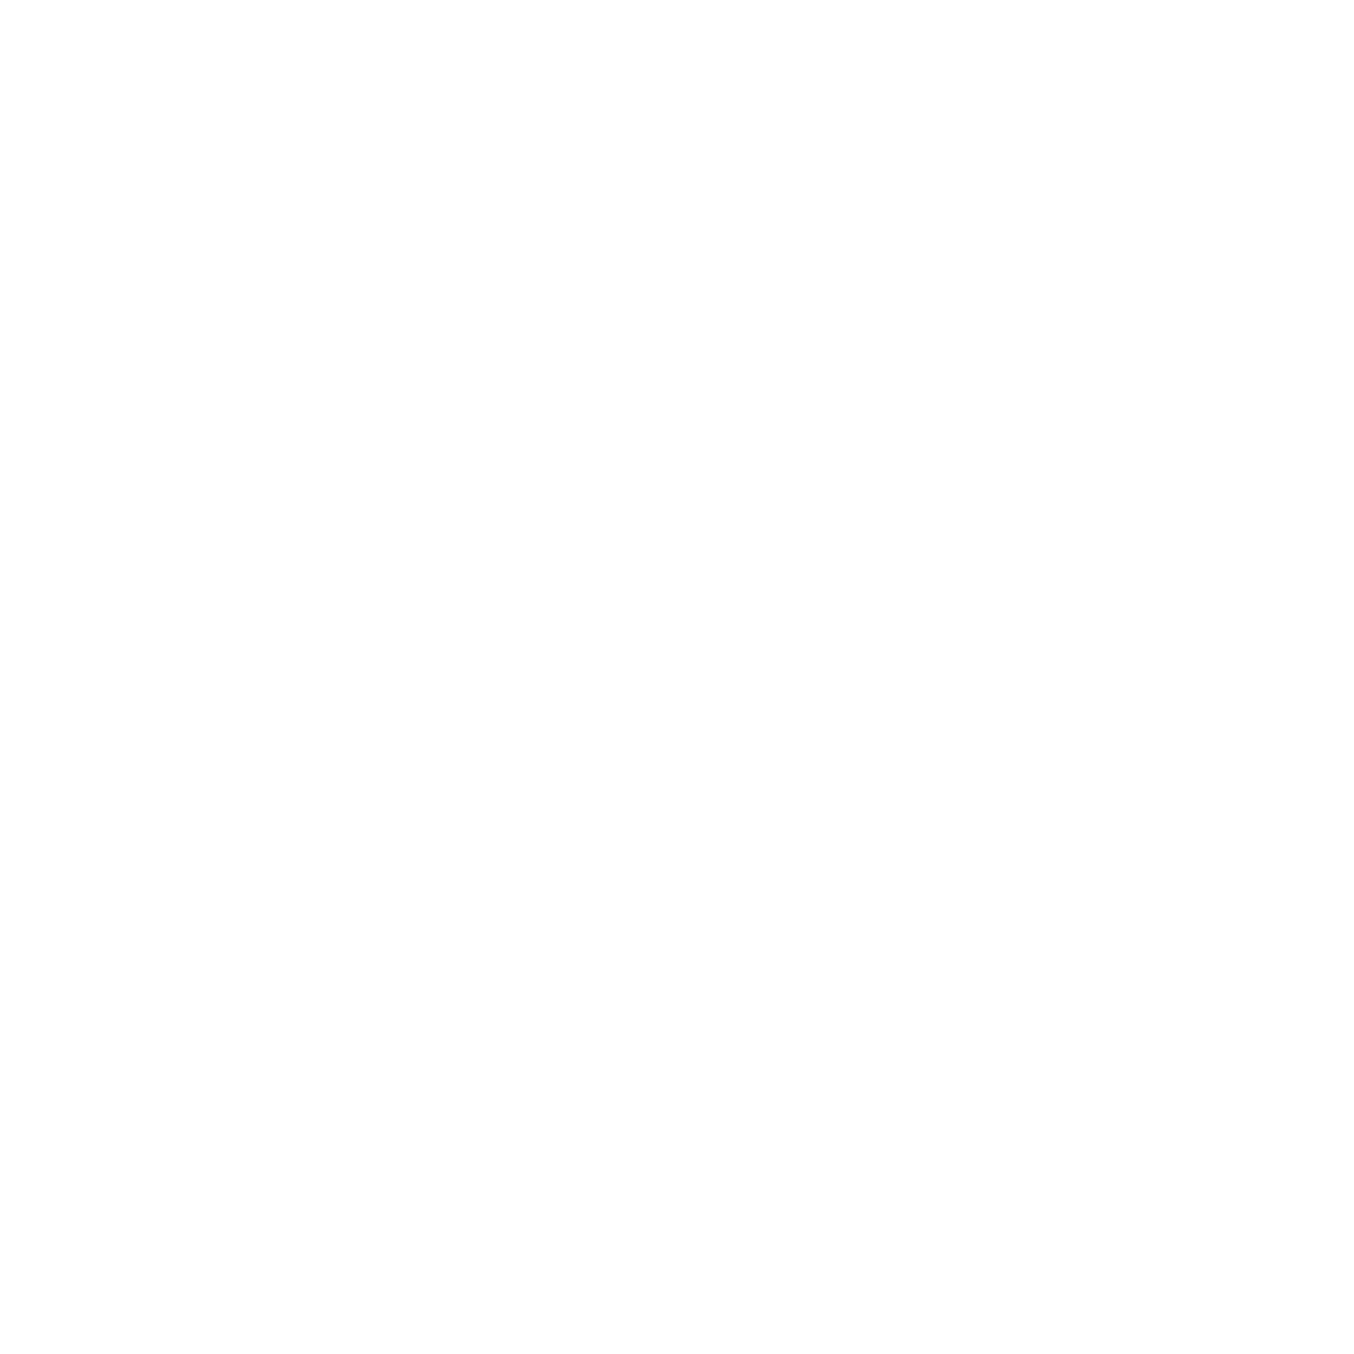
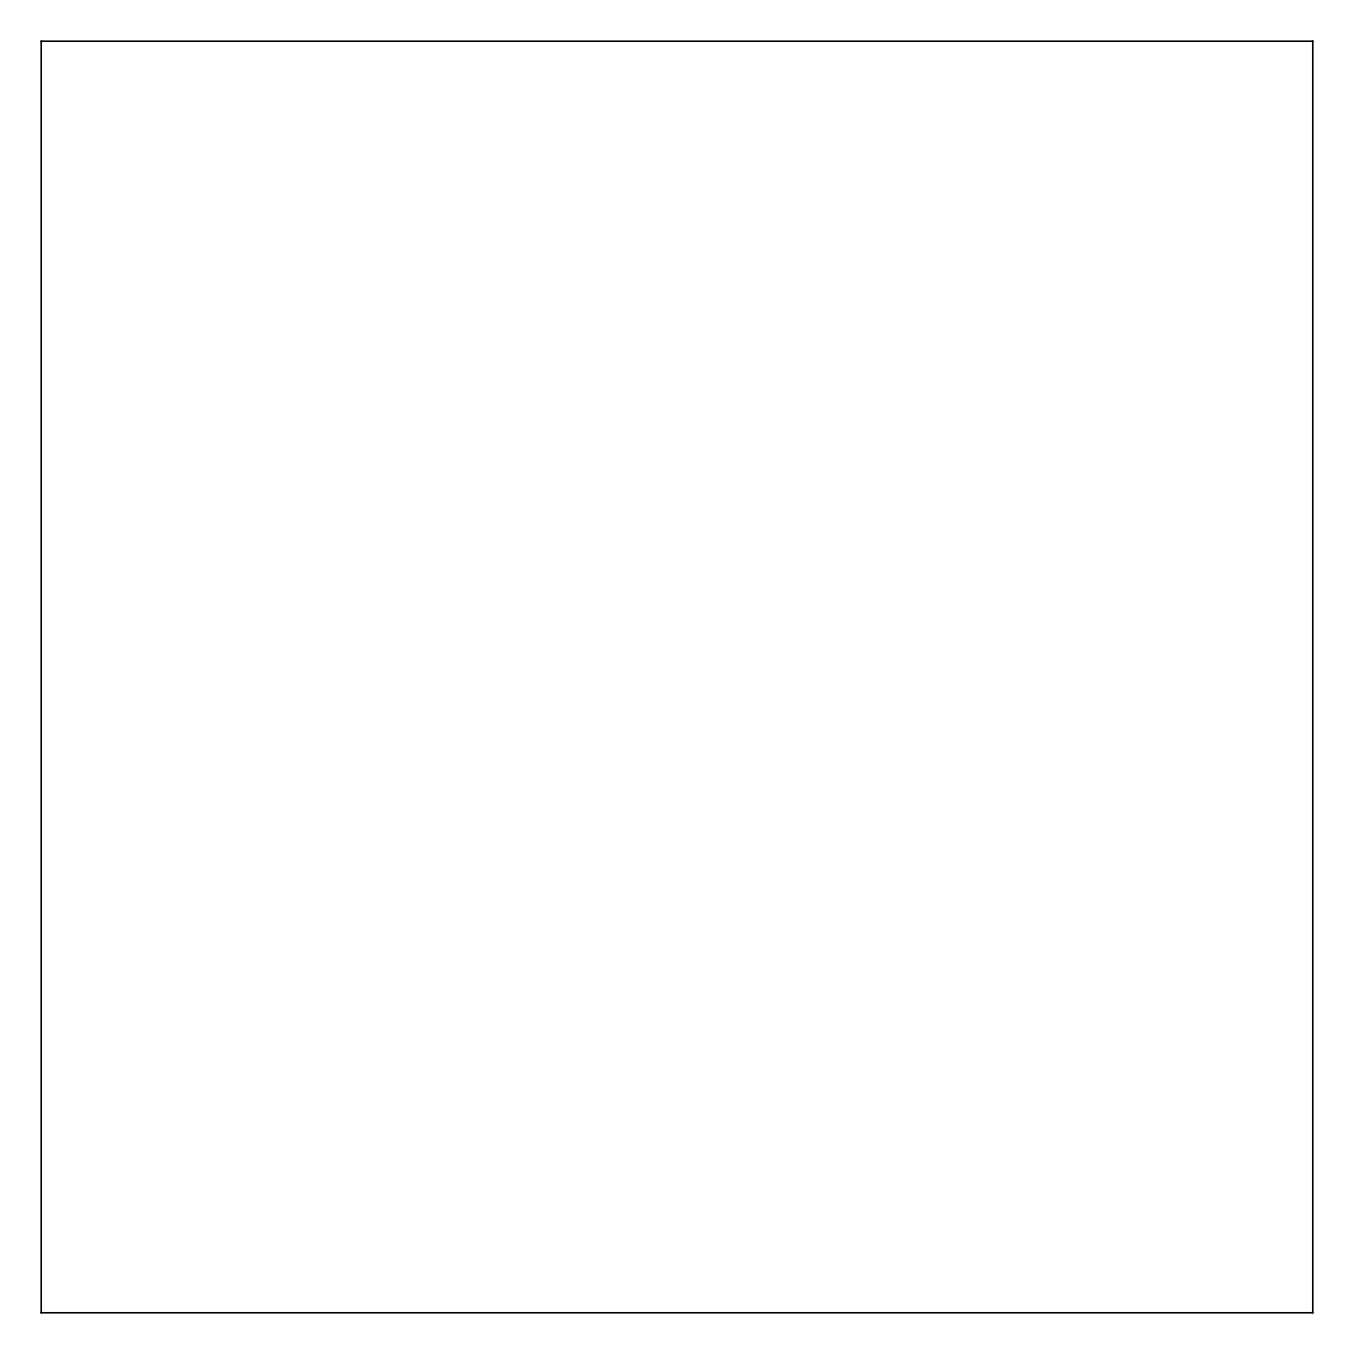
board edge: none -> (41, 41) (1312, 41) (1312, 1312) (41, 1312) (41, 41)

